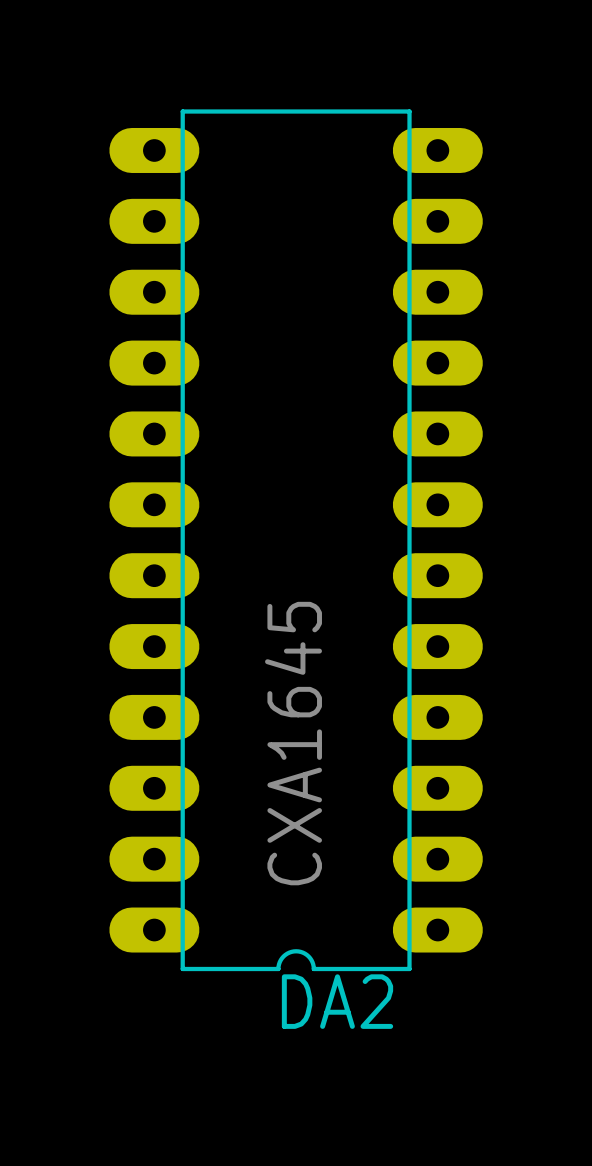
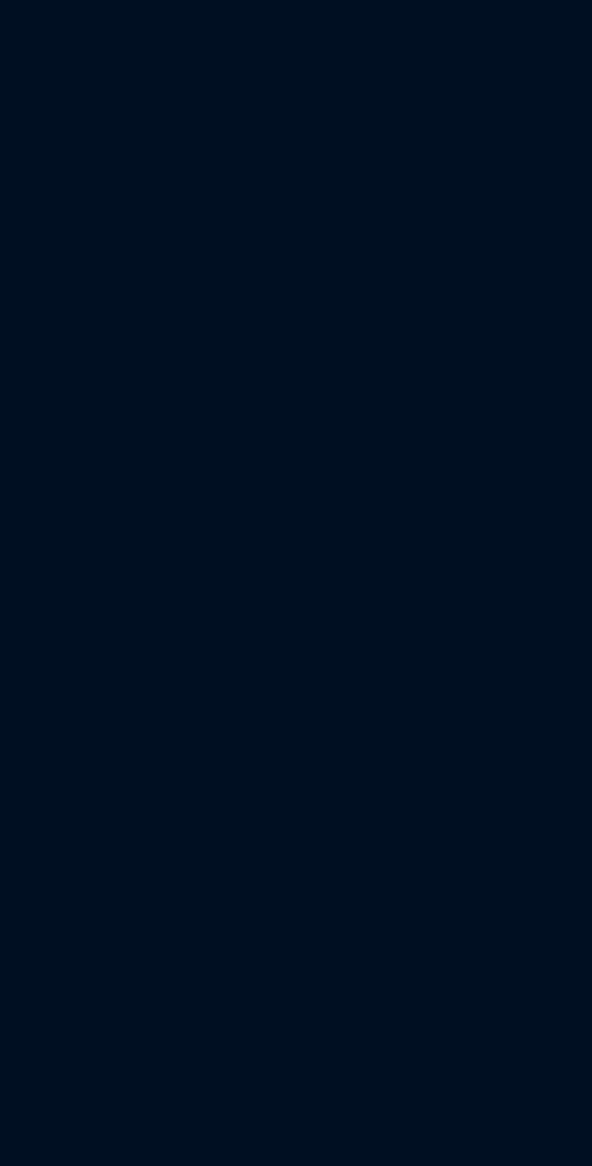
DA2: CXA1645 (296, 540) -> none

